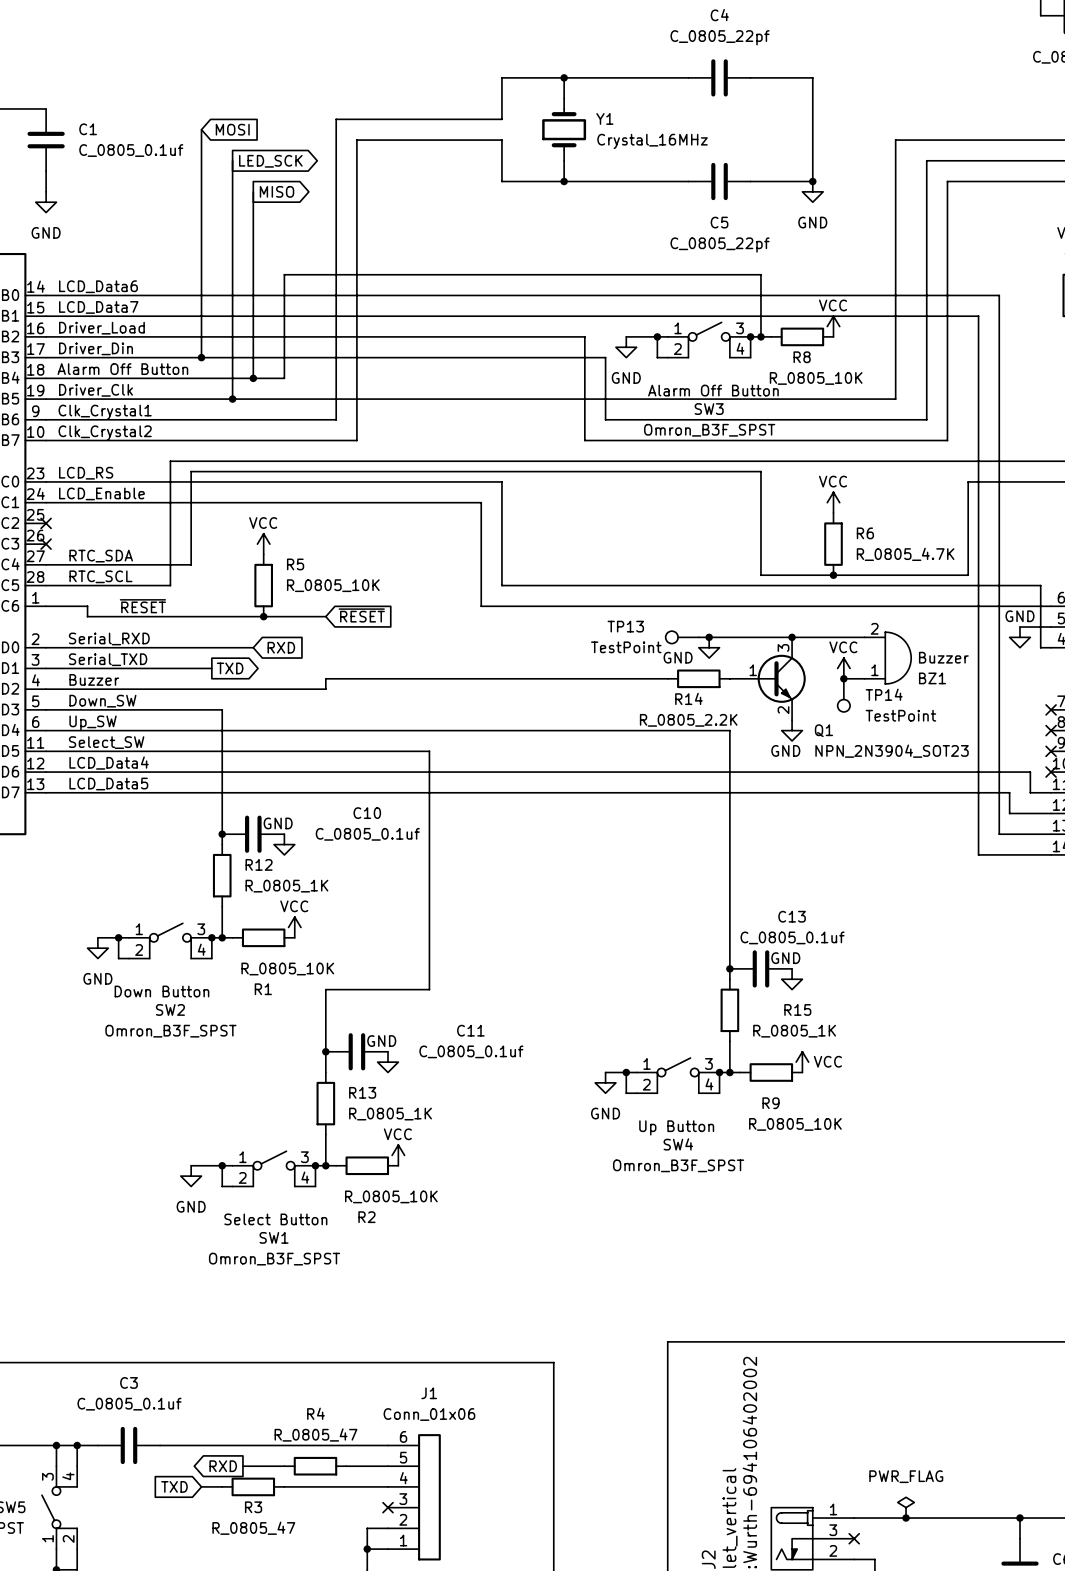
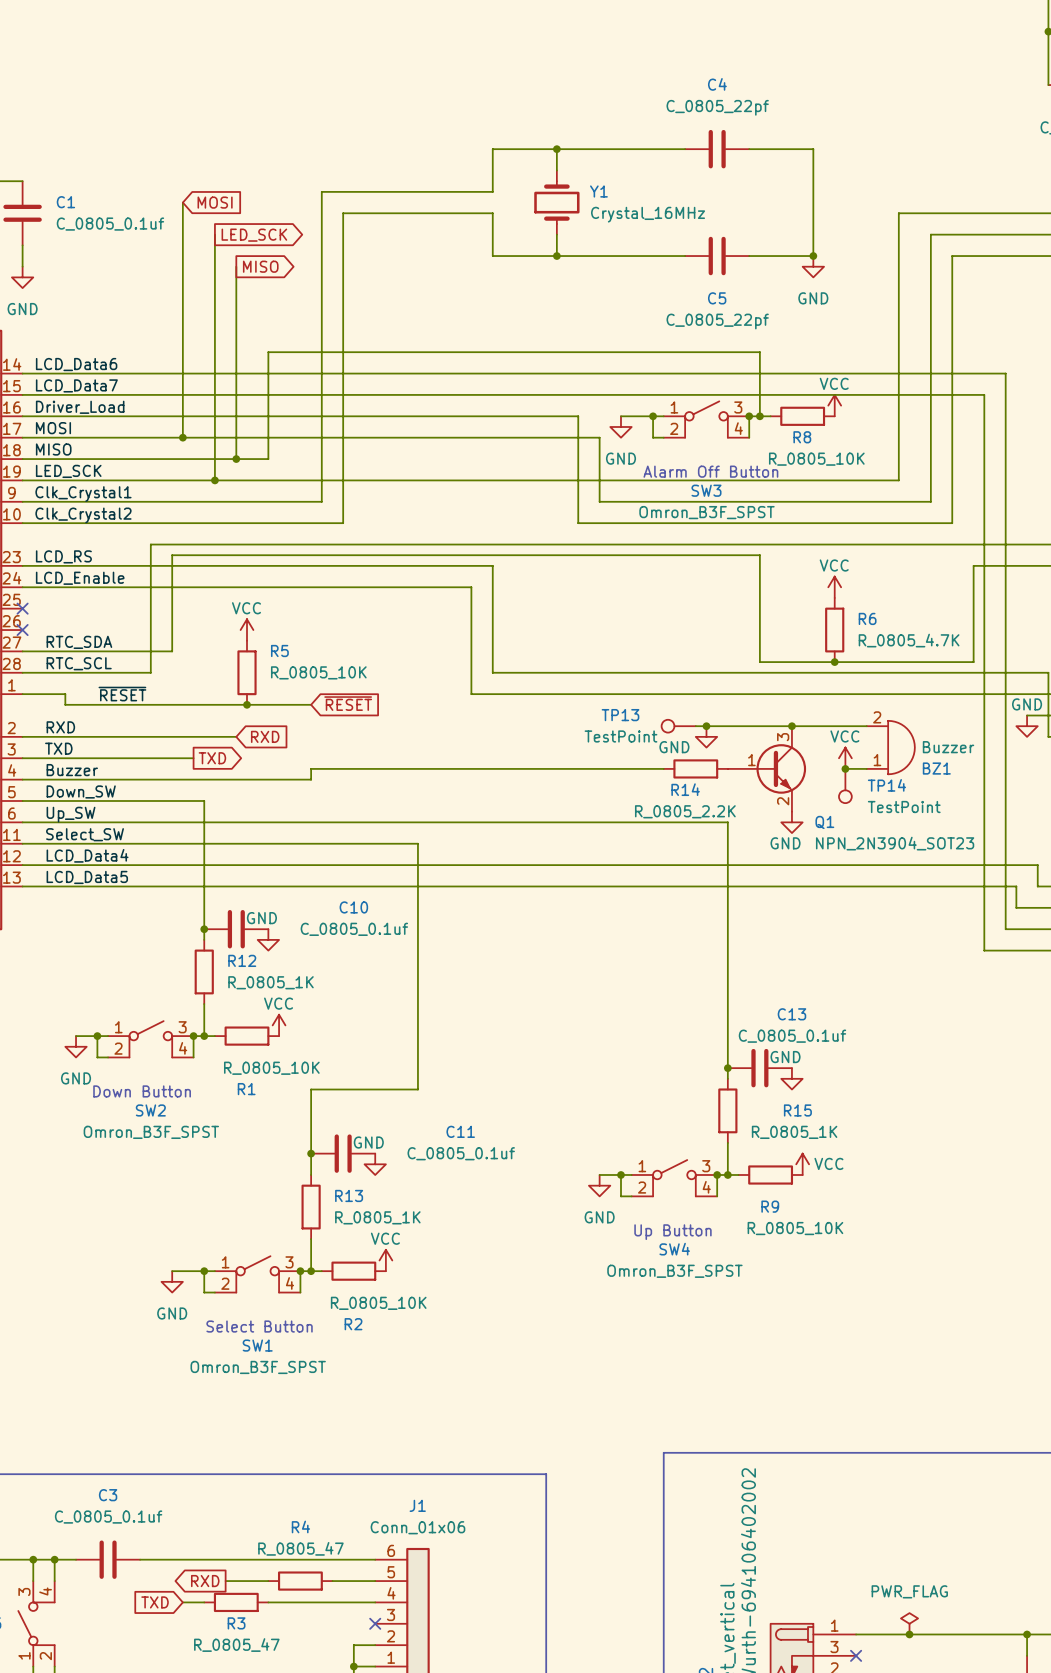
label: Driver_Din (96, 348) -> MOSI (53, 428)
label: Alarm Off Button (122, 369) -> MISO (53, 449)
label: Driver_Clk (96, 390) -> LED_SCK (68, 471)
label: Serial_RXD (109, 638) -> RXD (60, 727)
label: Serial_TXD (108, 659) -> TXD (58, 748)

